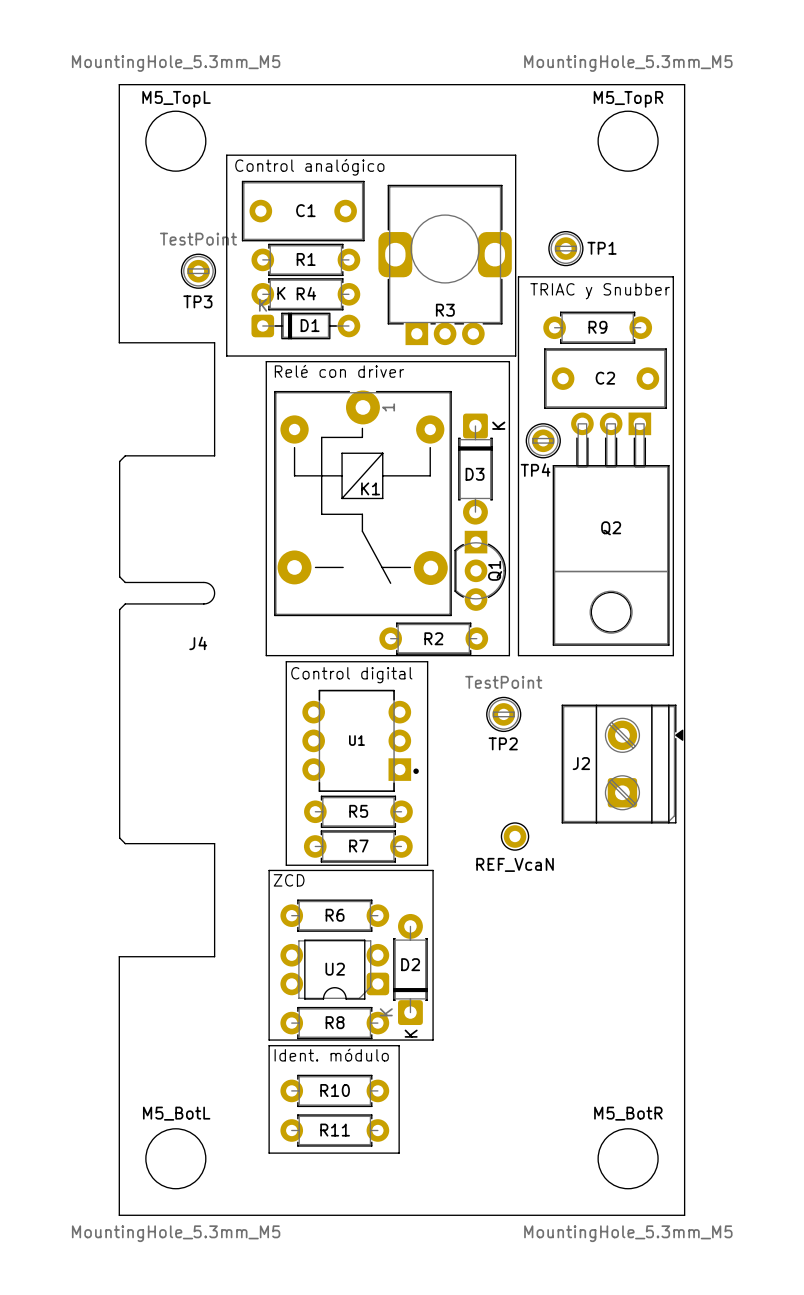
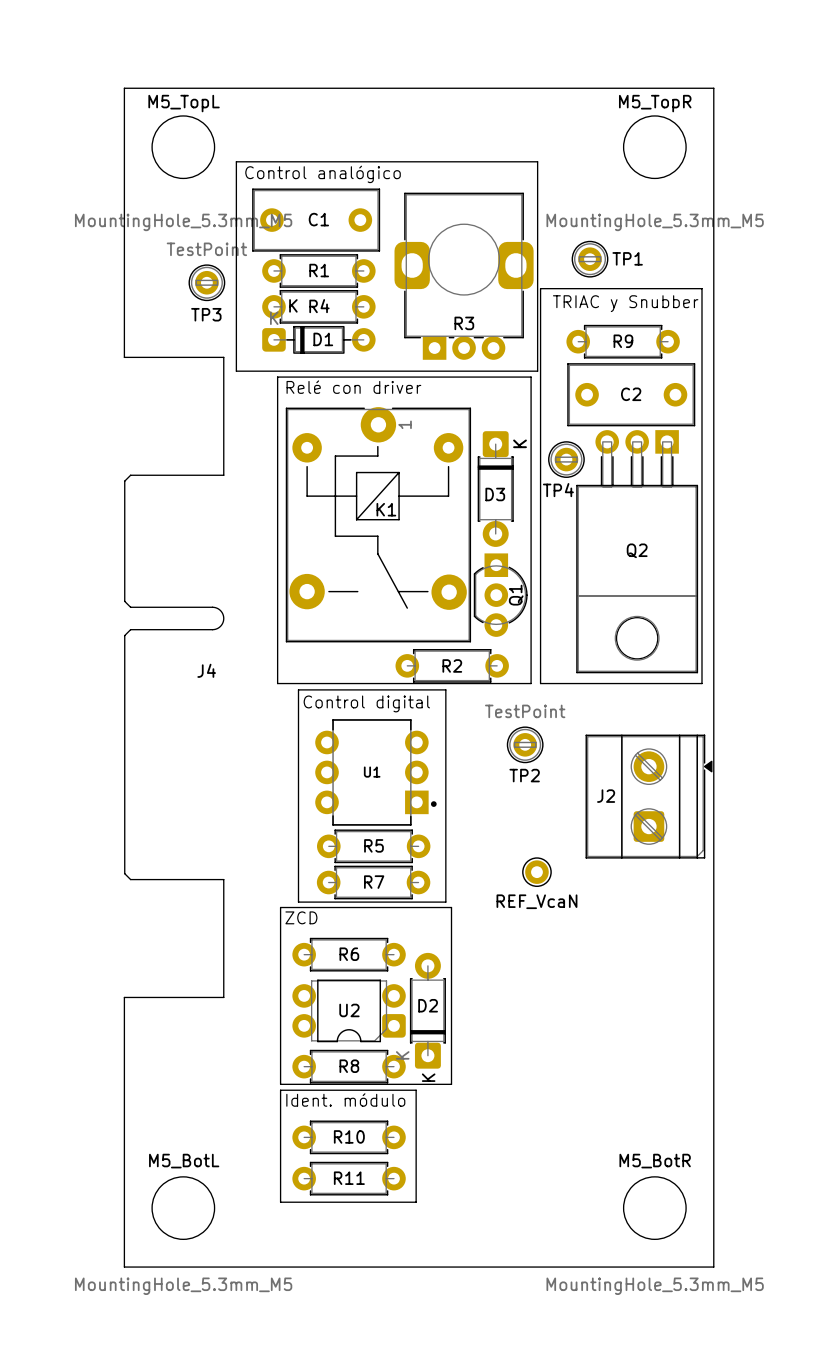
M5_TopL value position: MountingHole_5.3mm_M5 (176, 63) -> MountingHole_5.3mm_M5 (183, 222)
M5_TopR value position: MountingHole_5.3mm_M5 (628, 63) -> MountingHole_5.3mm_M5 (655, 222)

